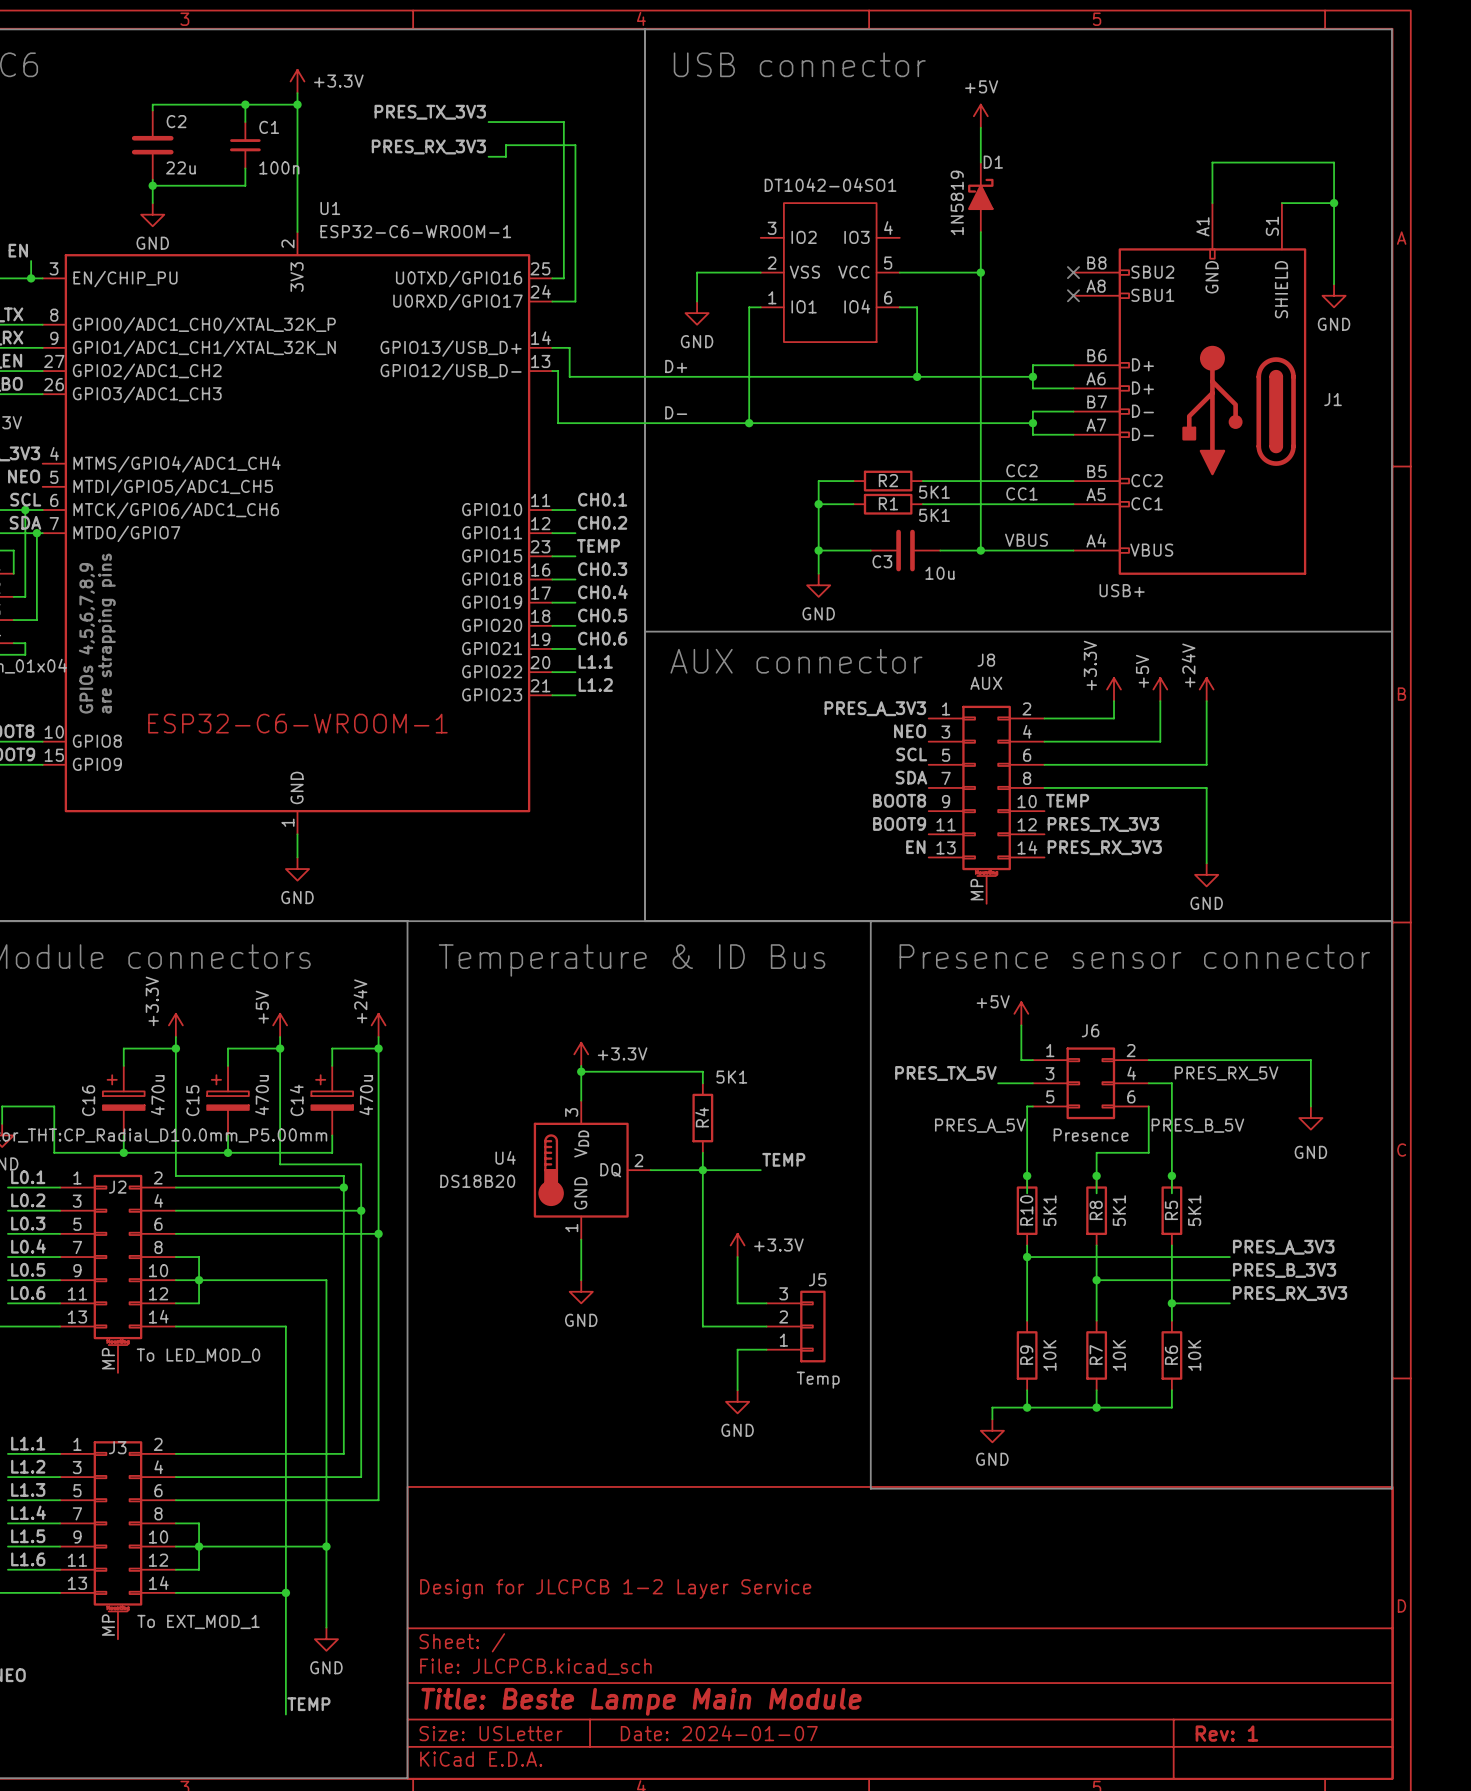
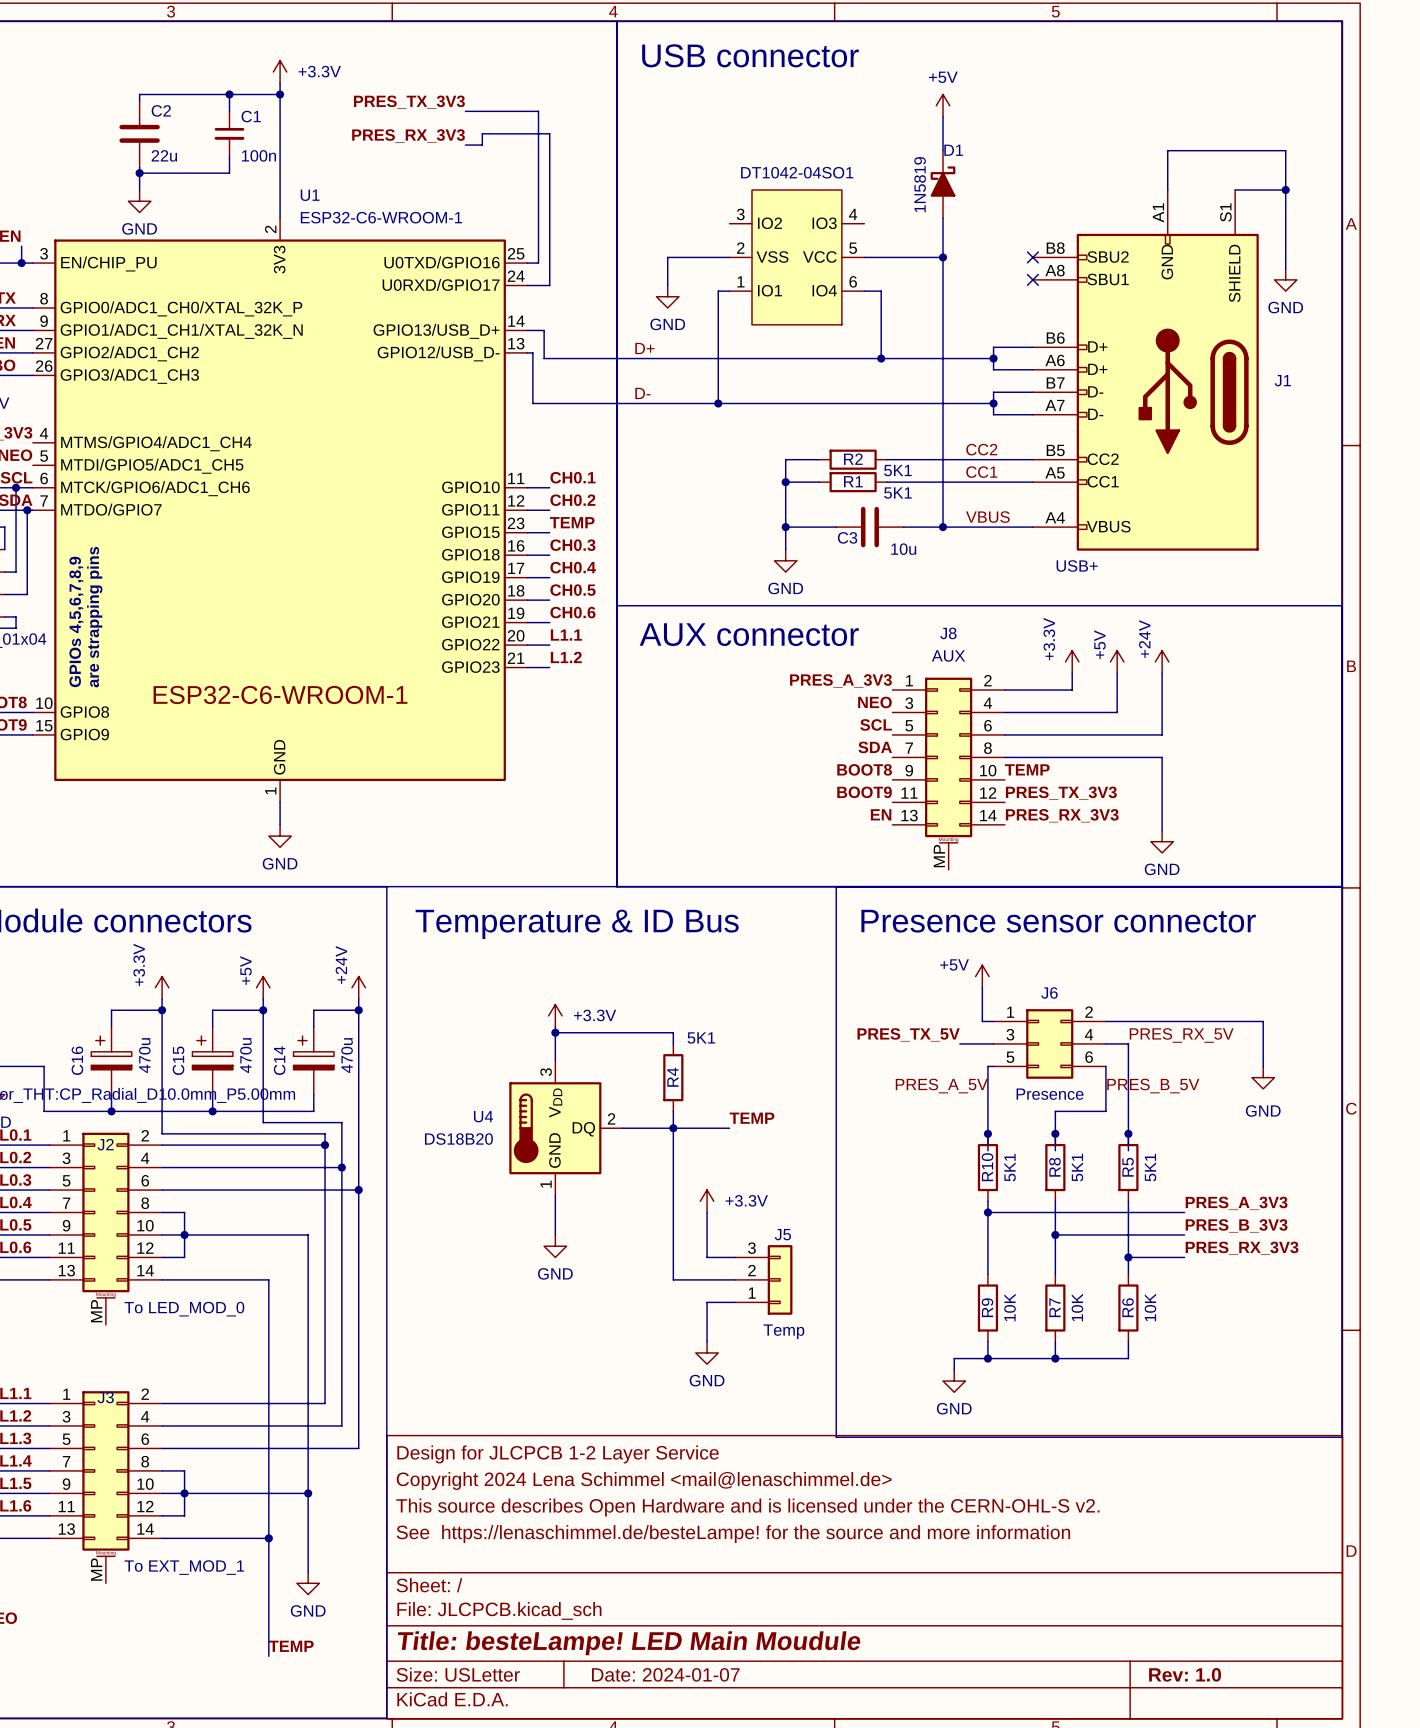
title block: none -> Design for JLCPCB 1-2 Layer Service (558, 1454)
title block: none -> Copyright 2024 Lena Schimmel <mail@lenaschimmel.de> (644, 1480)
title block: none -> This source describes Open Hardware and is licensed under the CERN-OHL-S v2. (747, 1507)
title block: Design for JLCPCB 1-2 Layer Service (615, 1589) -> See https://lenaschimmel.de/besteLampe! for the source and more information (733, 1534)
title block: Title: Beste Lampe Main Module (641, 1701) -> Title: besteLampe! LED Main Moudule (629, 1643)
title block: Rev: 1 (1226, 1733) -> Rev: 1.0 (1185, 1674)

